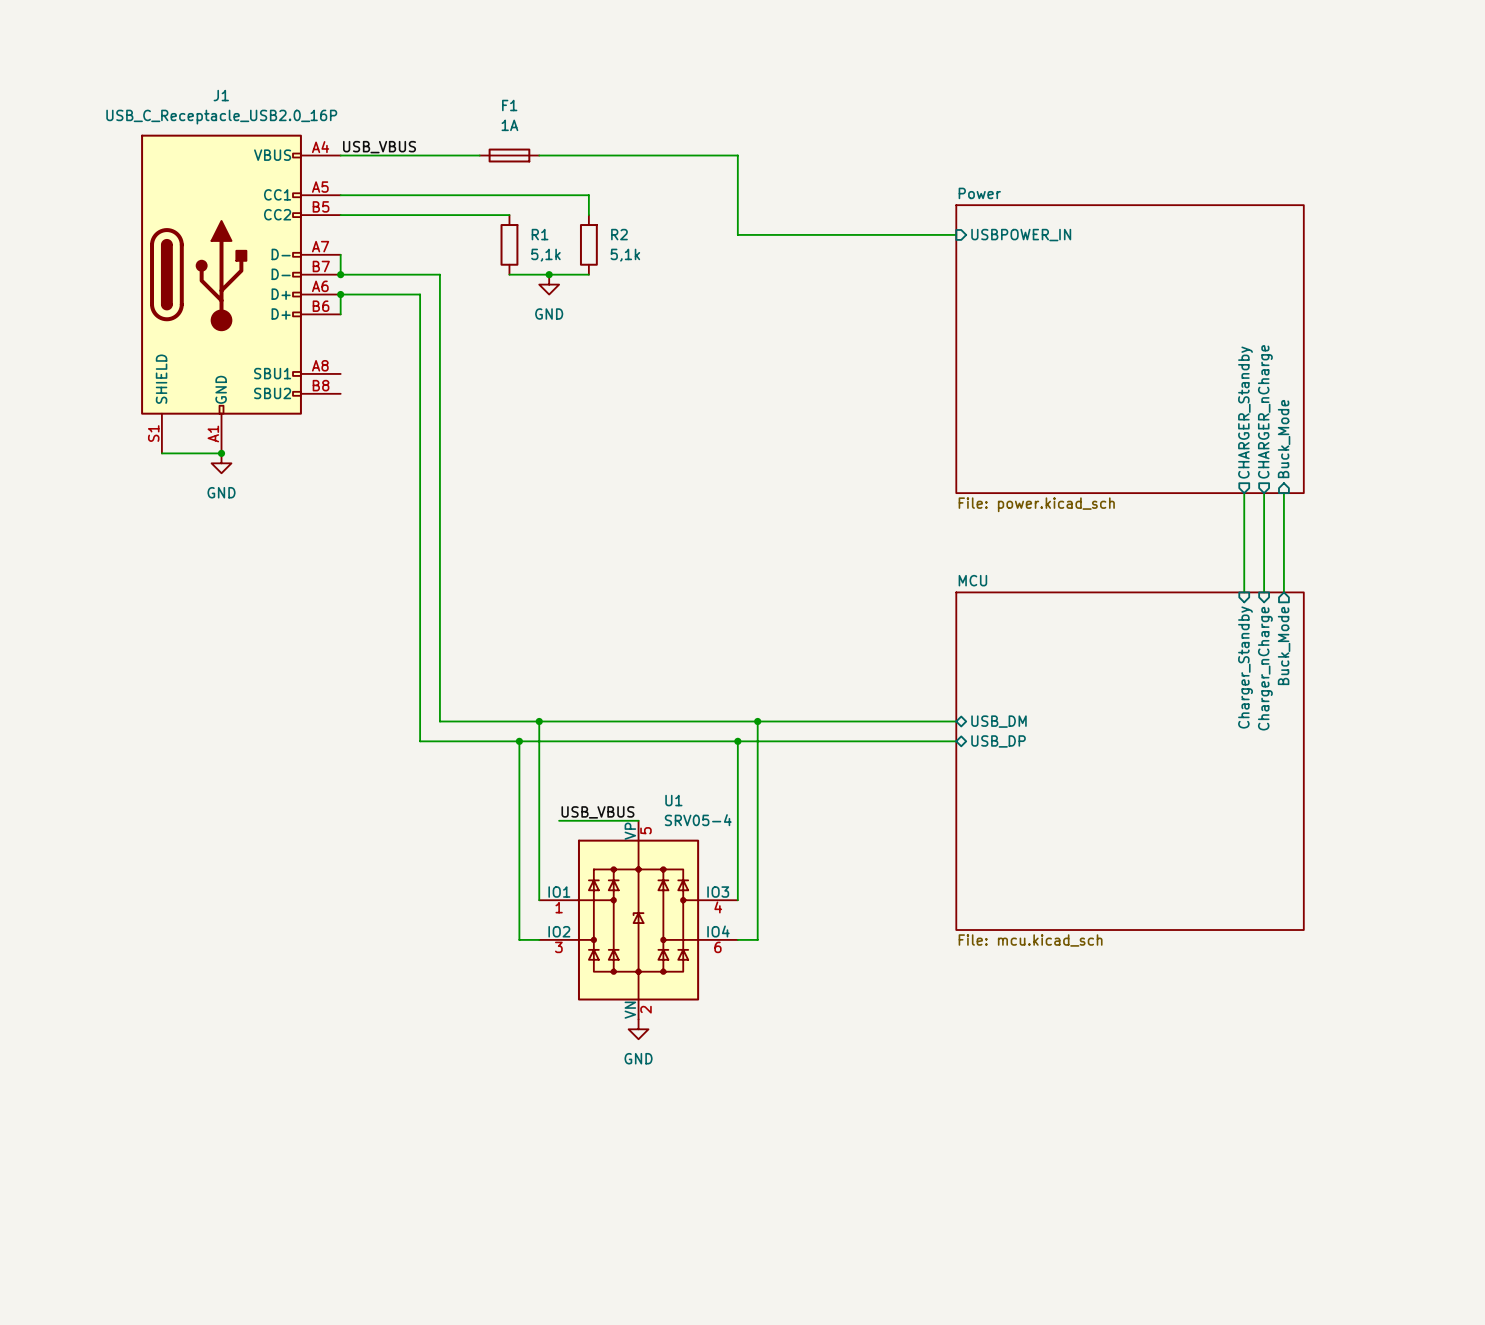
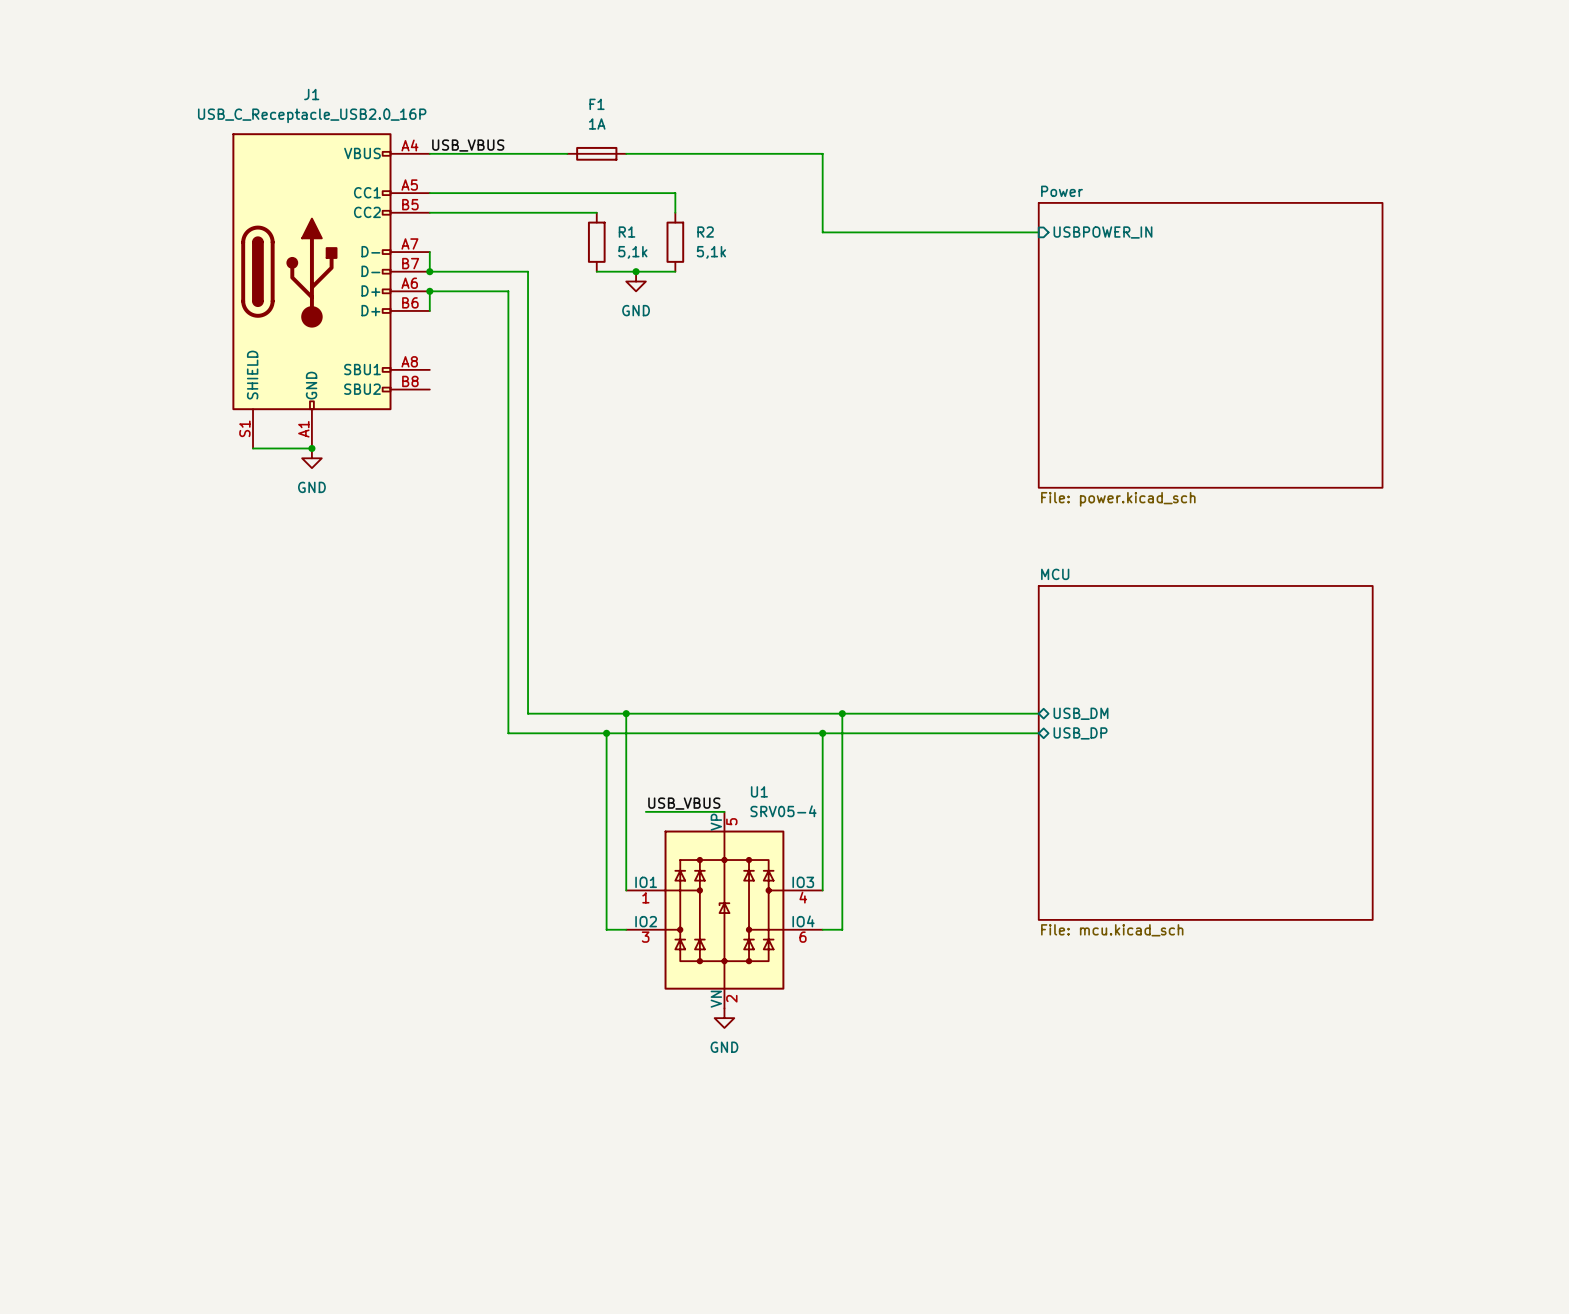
sheet pin: CHARGER_nCharge (1265, 411) -> none
sheet pin: CHARGER_Standby (1245, 412) -> none
sheet pin: Buck_Mode (1284, 439) -> none
wire: (1244, 493) (1244, 592) -> none
wire: (1264, 493) (1264, 592) -> none
wire: (1283, 493) (1283, 592) -> none
sheet MCU shape: [955, 591, 1305, 931] -> [1038, 585, 1374, 921]
sheet pin: Buck_Mode (1284, 645) -> none
sheet pin: Charger_Standby (1245, 667) -> none
sheet pin: Charger_nCharge (1265, 668) -> none

